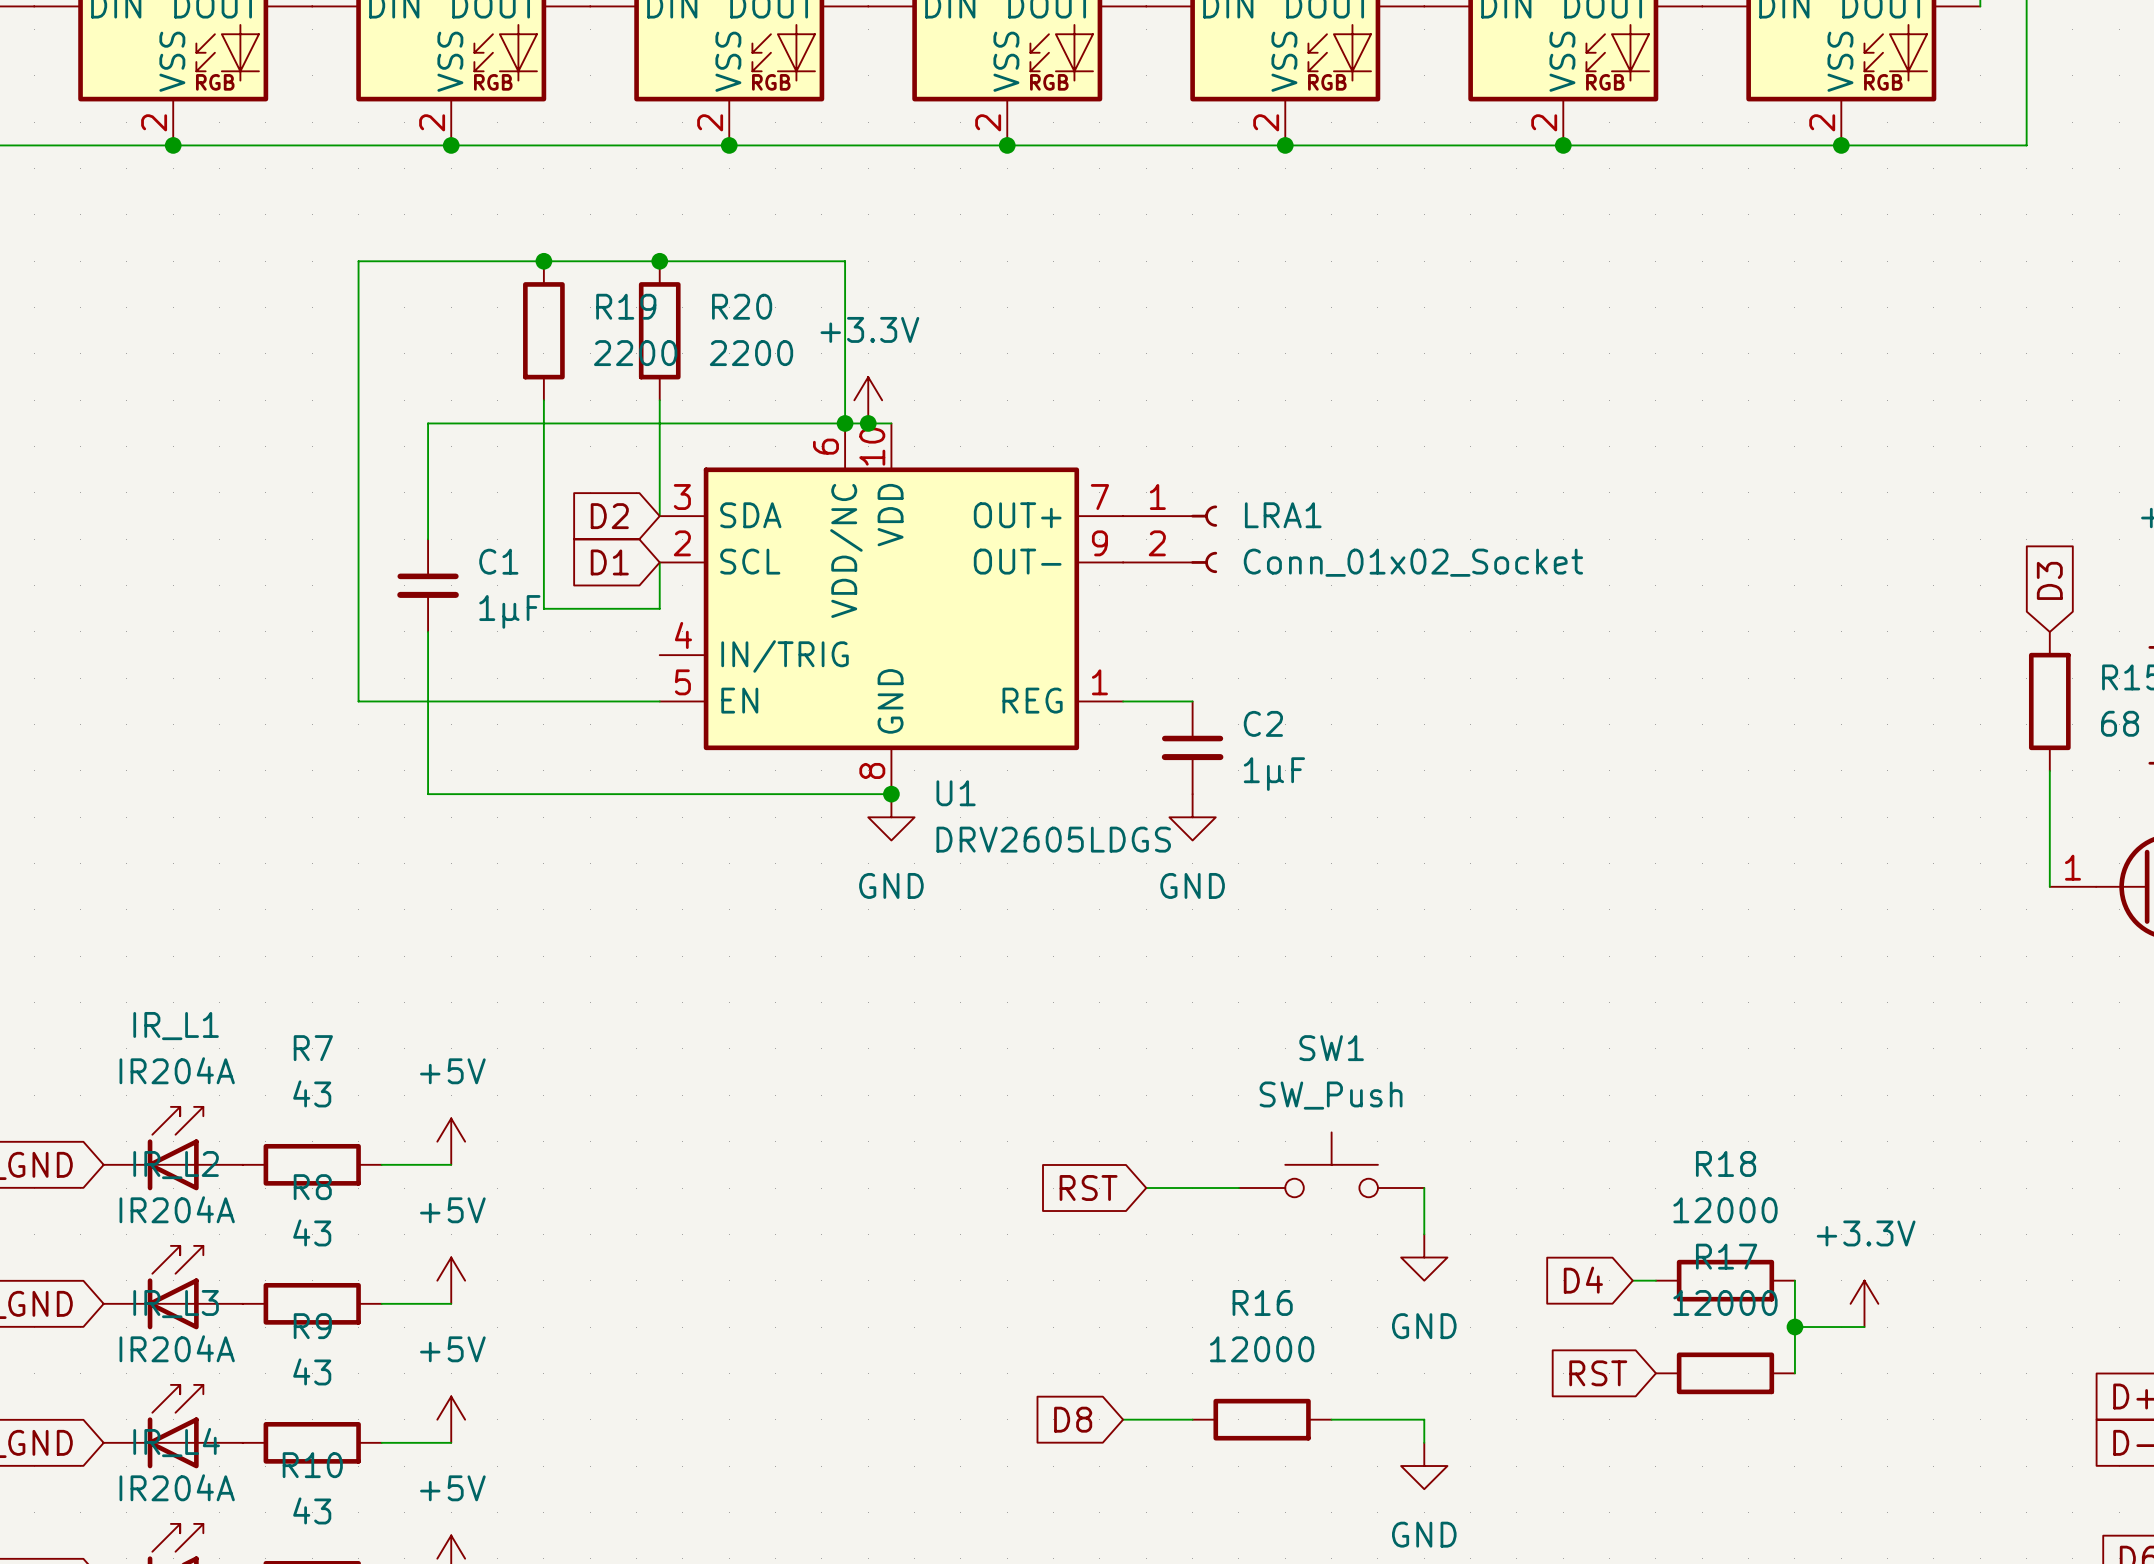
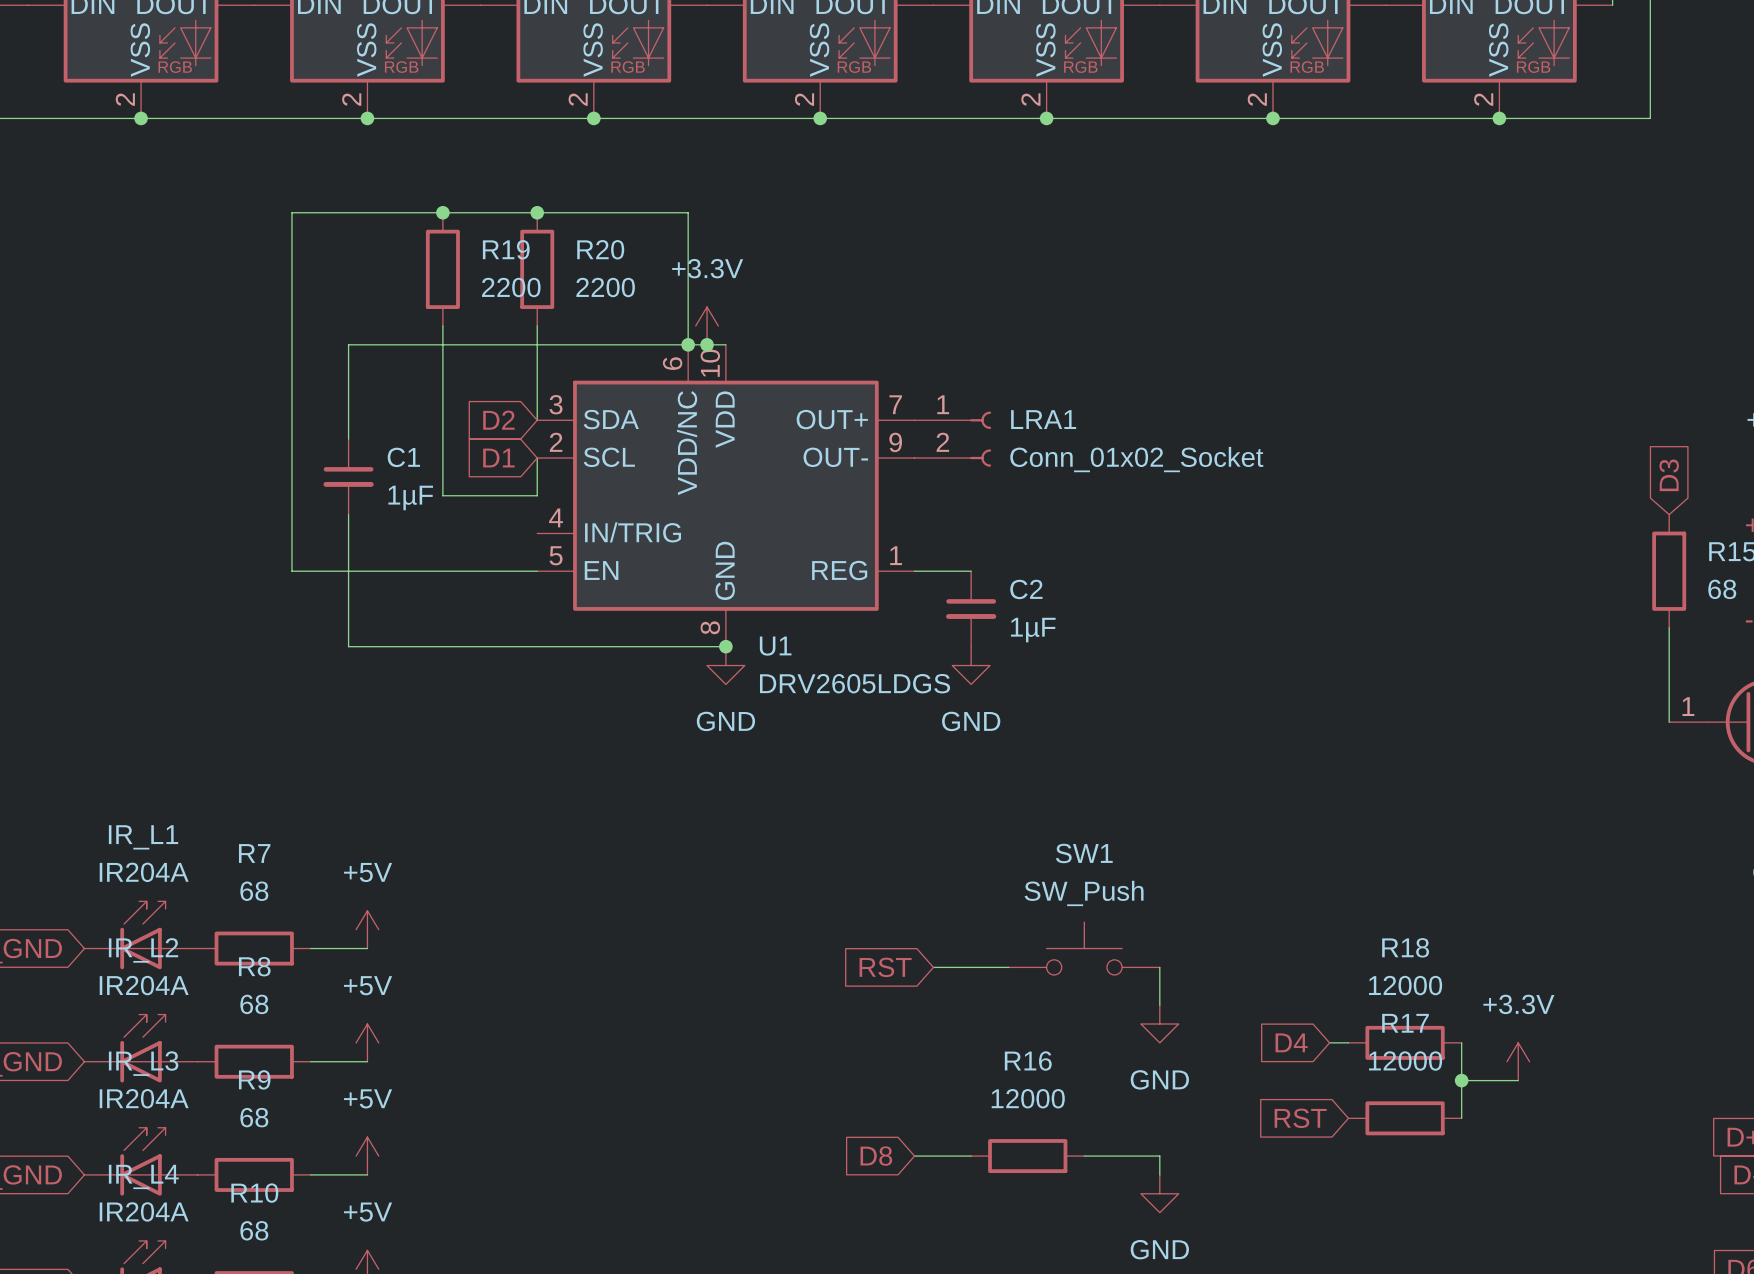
R7 value: 43 (312, 1093) -> 68 (254, 891)
R8 value: 43 (312, 1232) -> 68 (254, 1004)
R9 value: 43 (312, 1371) -> 68 (254, 1117)
R10 value: 43 (312, 1510) -> 68 (254, 1230)

